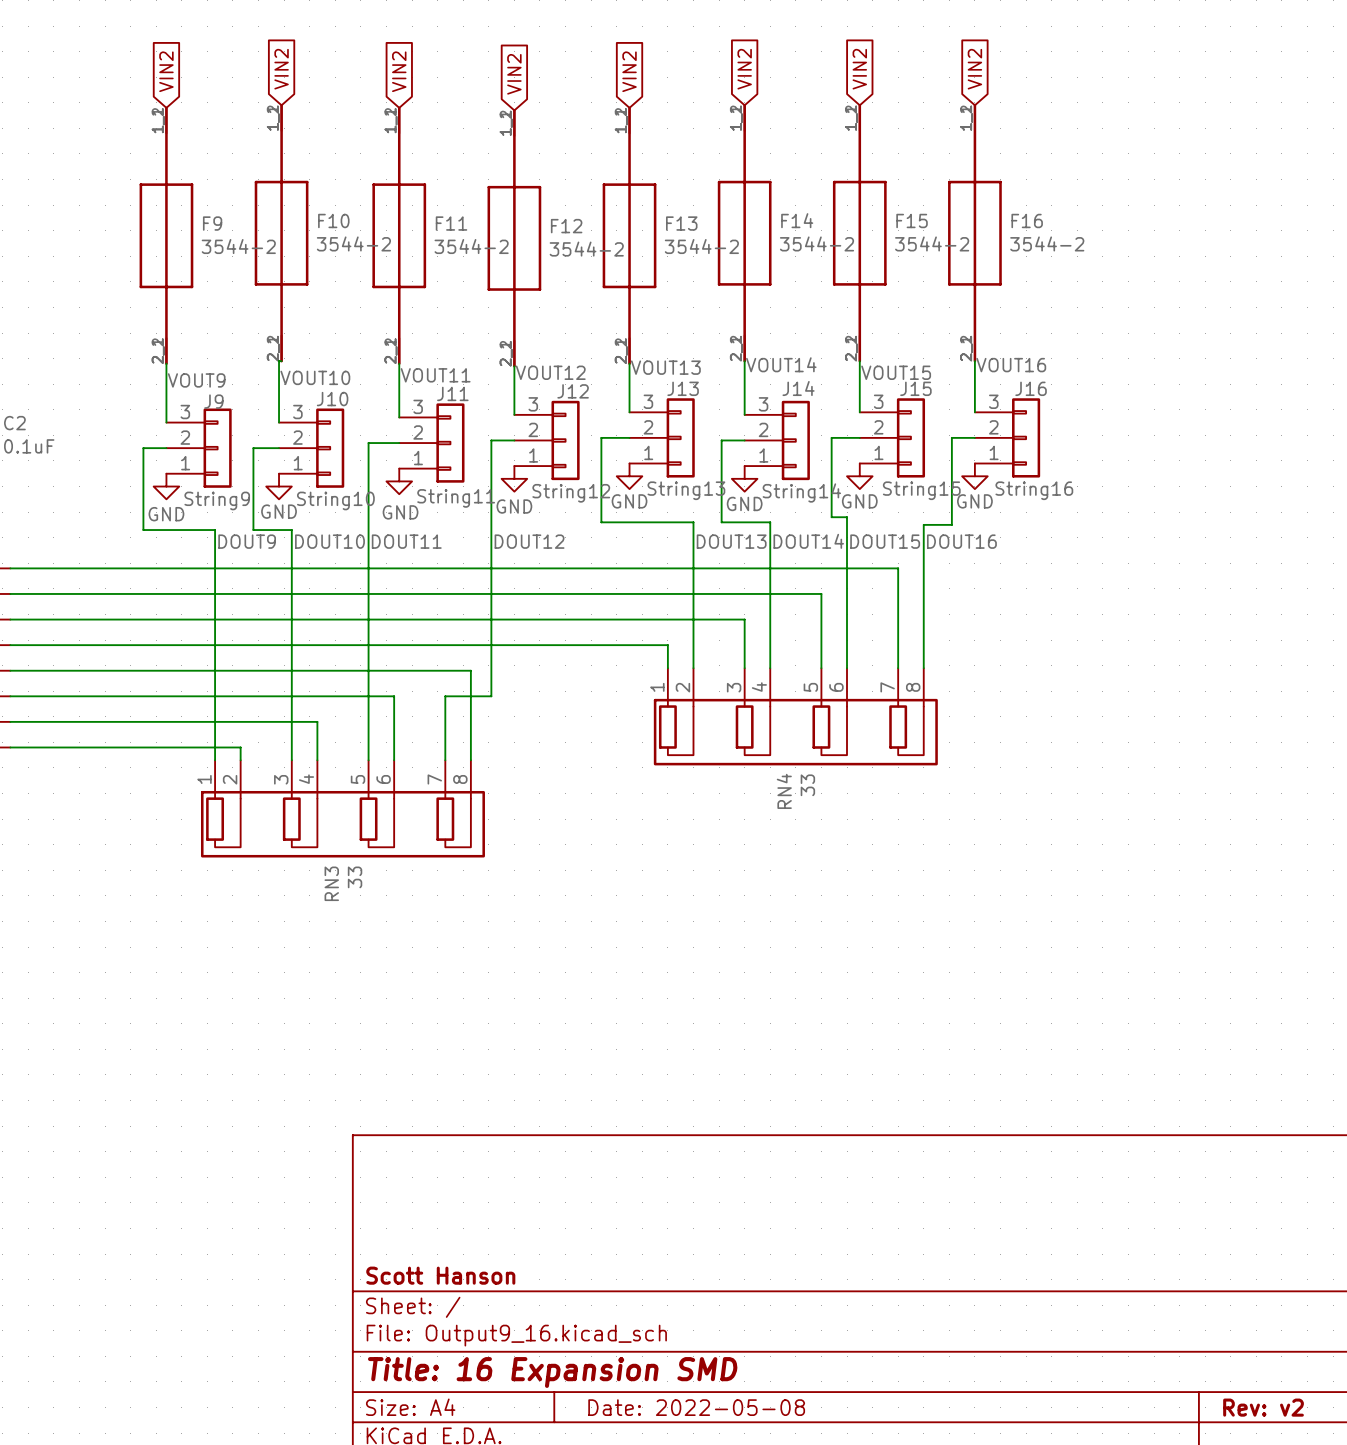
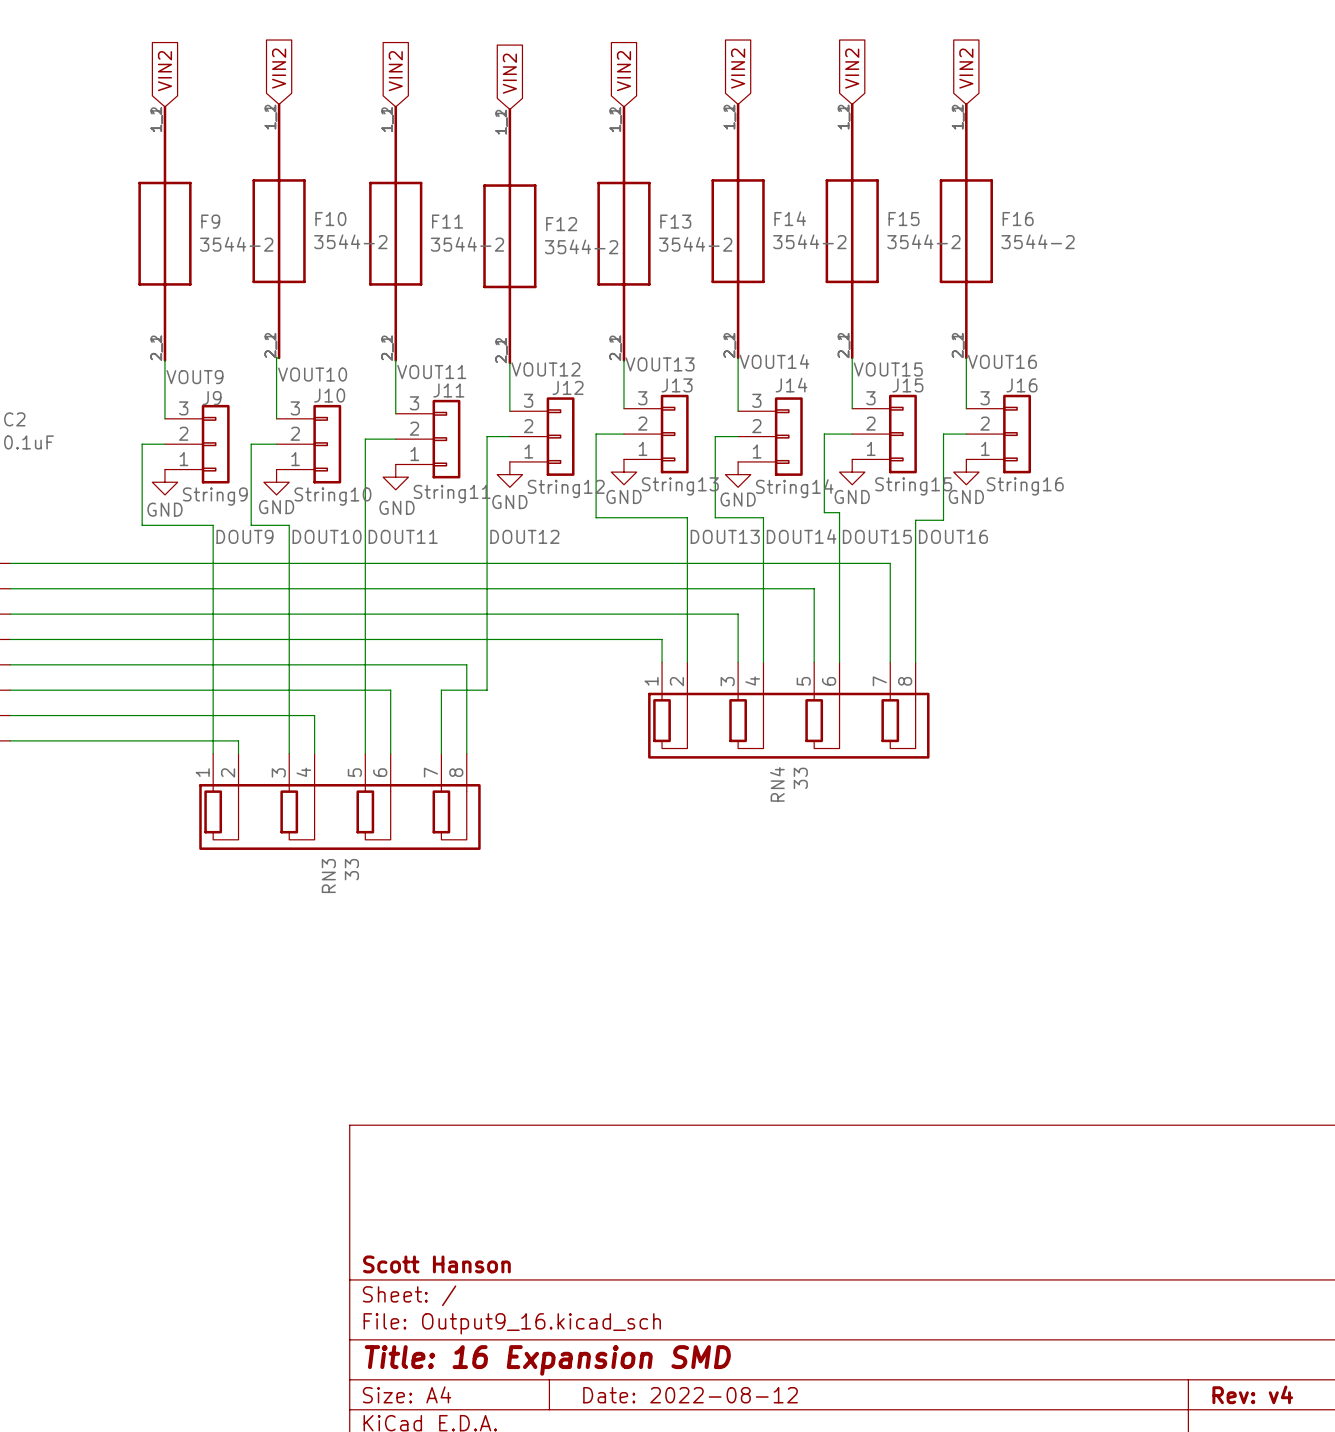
title block: Date: 2022-05-08 (696, 1407) -> Date: 2022-08-12 (690, 1395)
title block: Rev: v2 (1263, 1407) -> Rev: v4 (1252, 1394)

